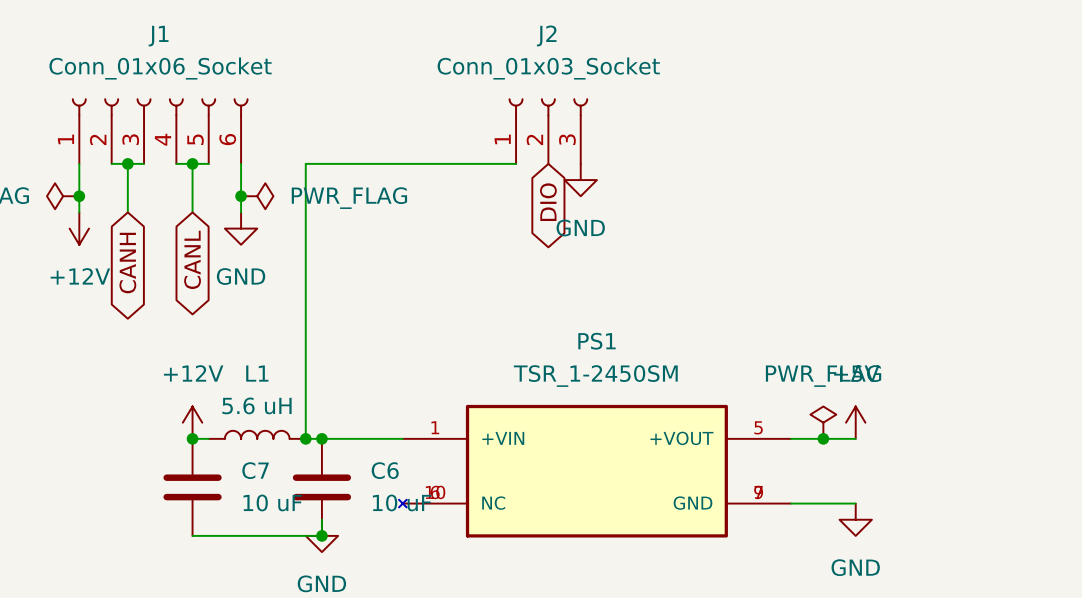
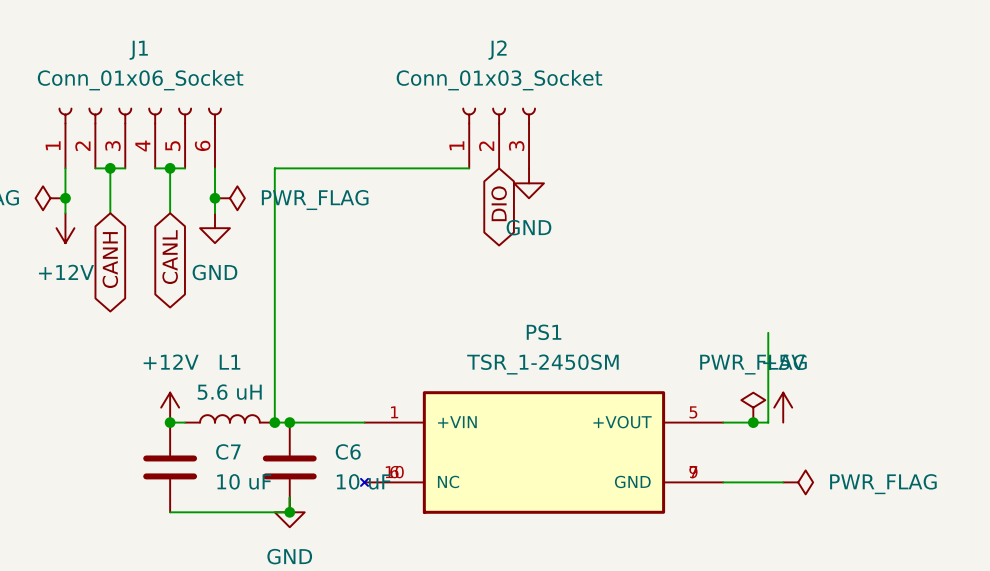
wire: (839, 438) (855, 438) -> (768, 422) (768, 332)
power symbol: none -> PWR_FLAG (798, 482)
power symbol: GND (855, 519) -> none

